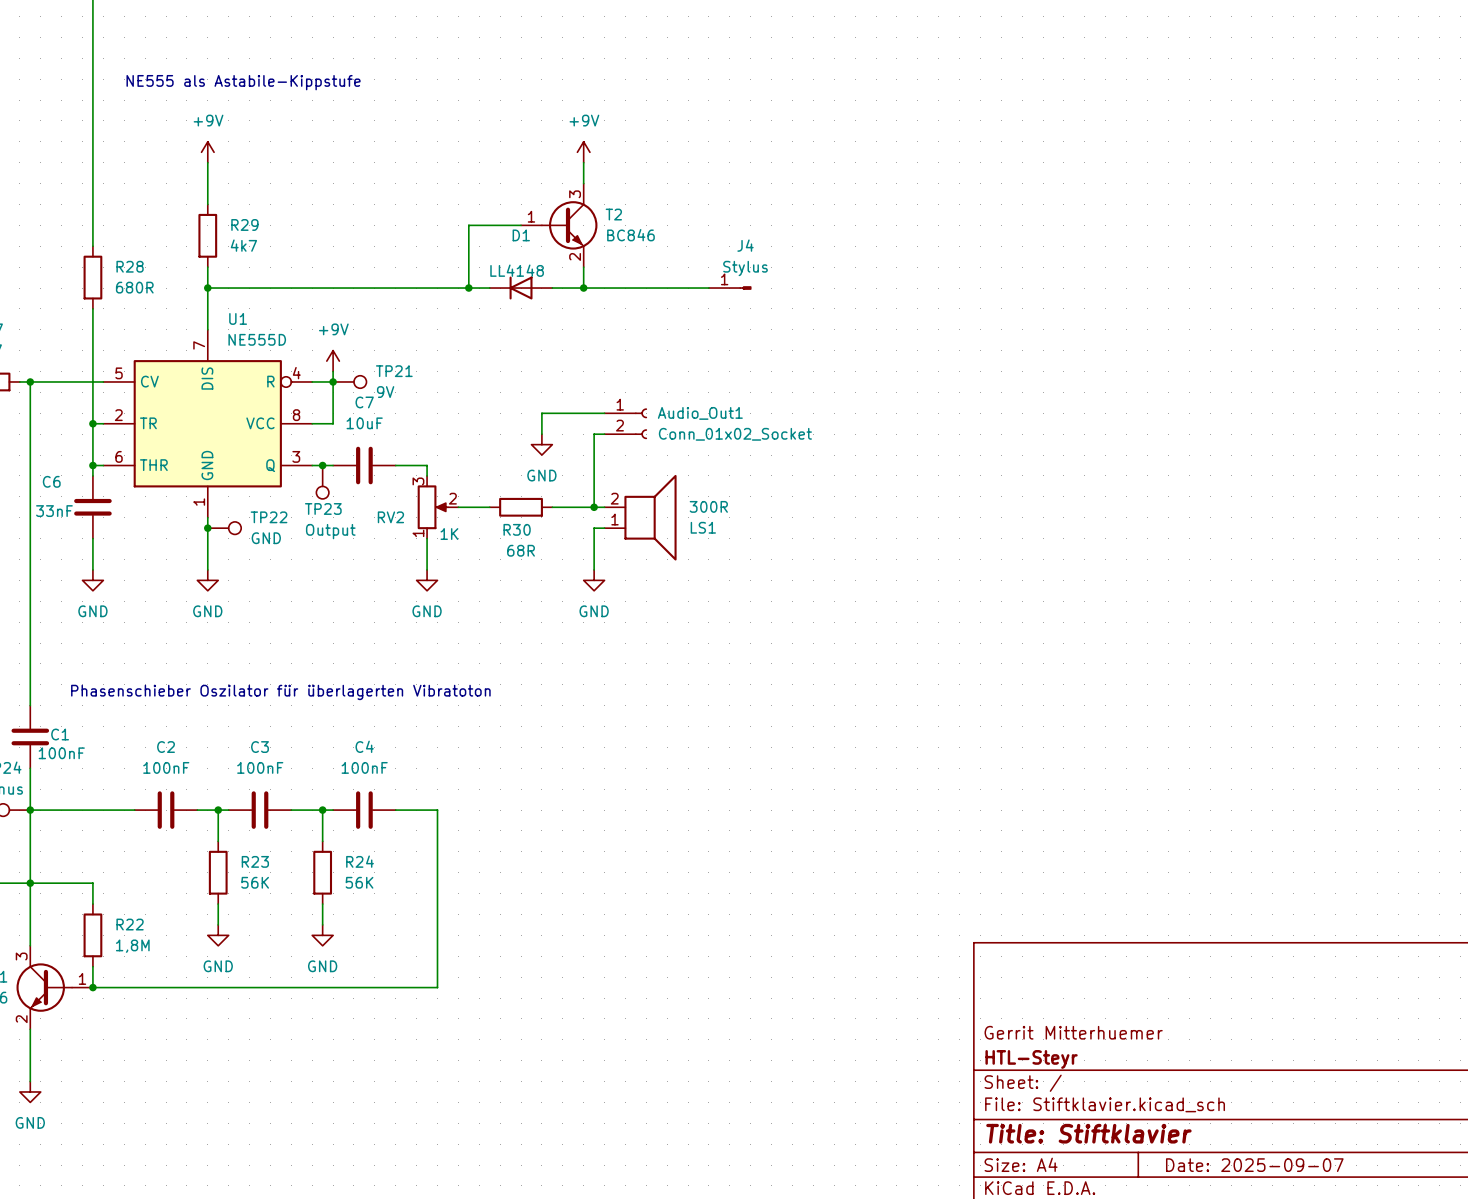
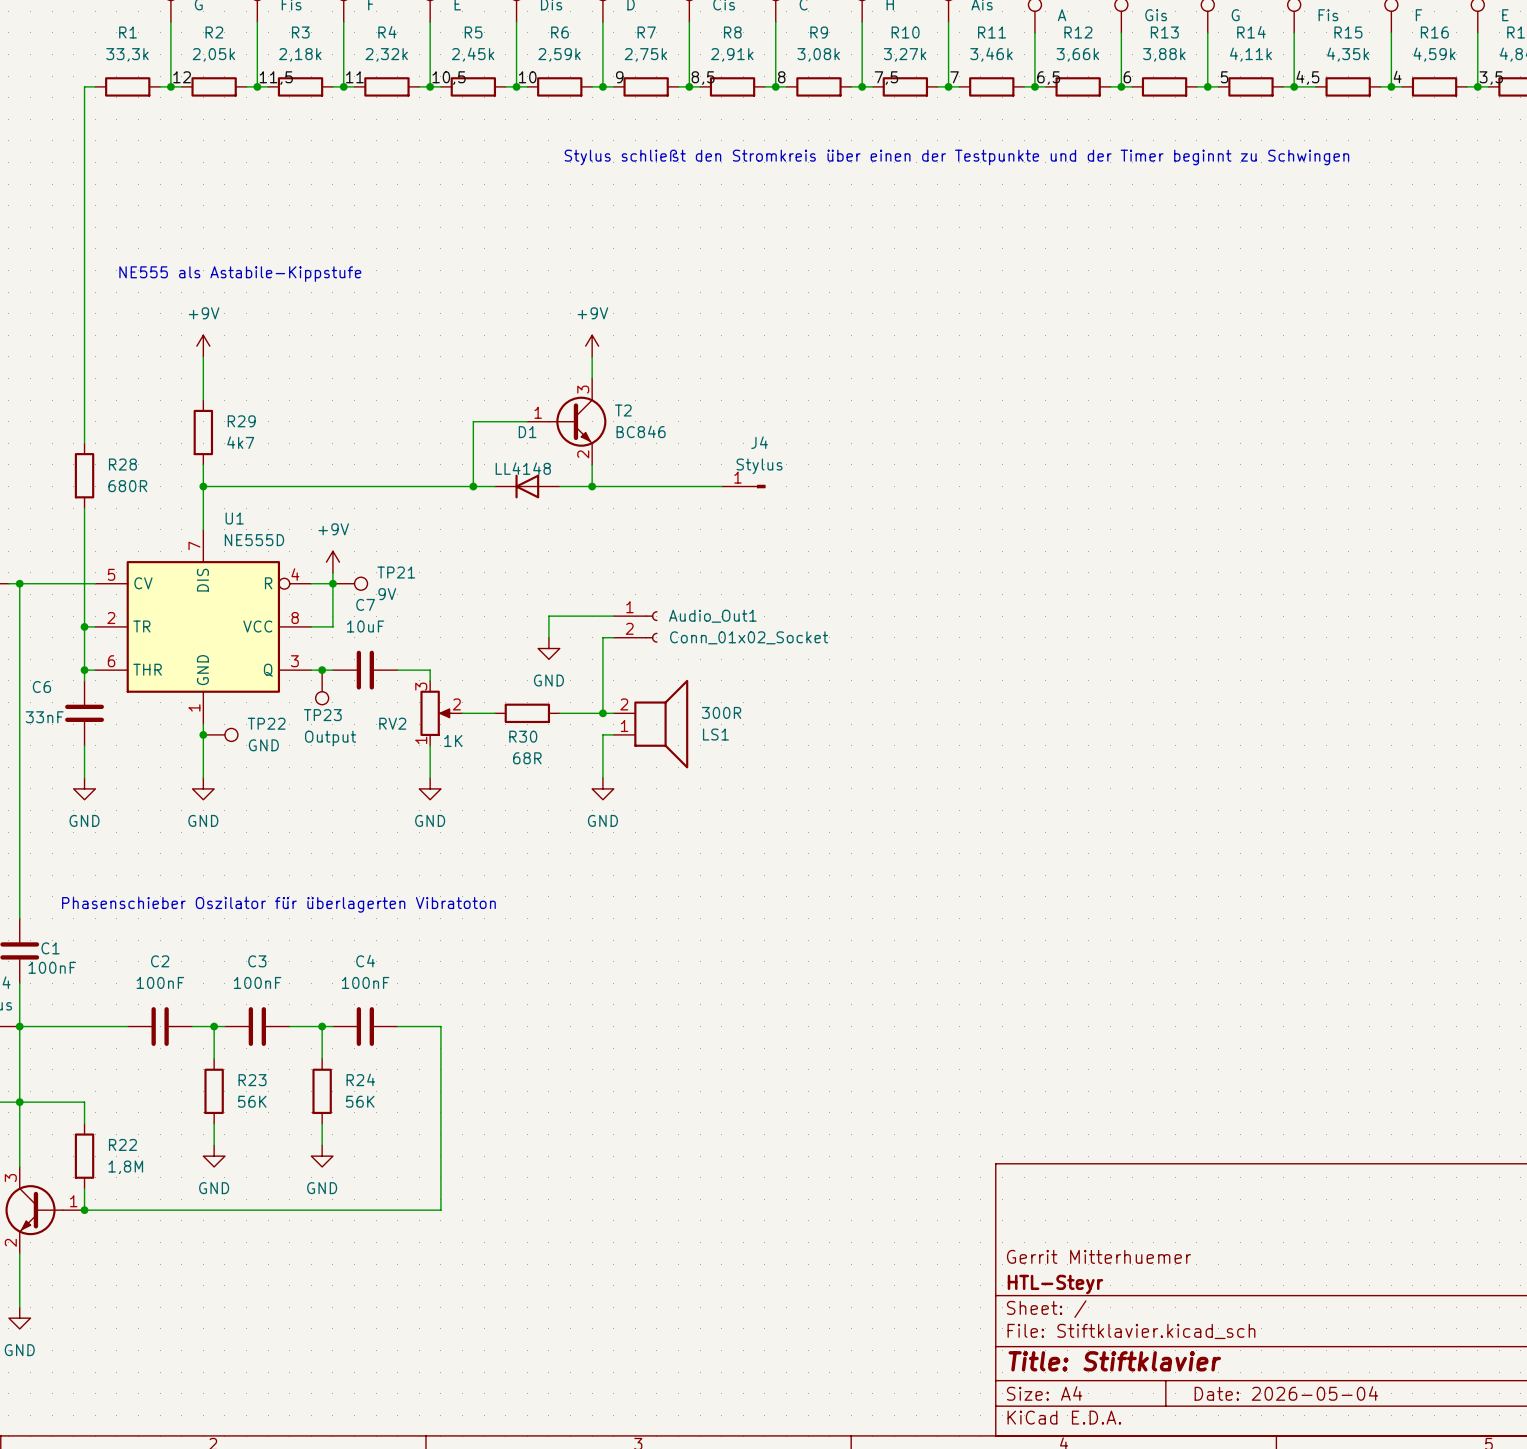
title block: Date: 2025-09-07 (1254, 1165) -> Date: 2026-05-04 (1286, 1393)

